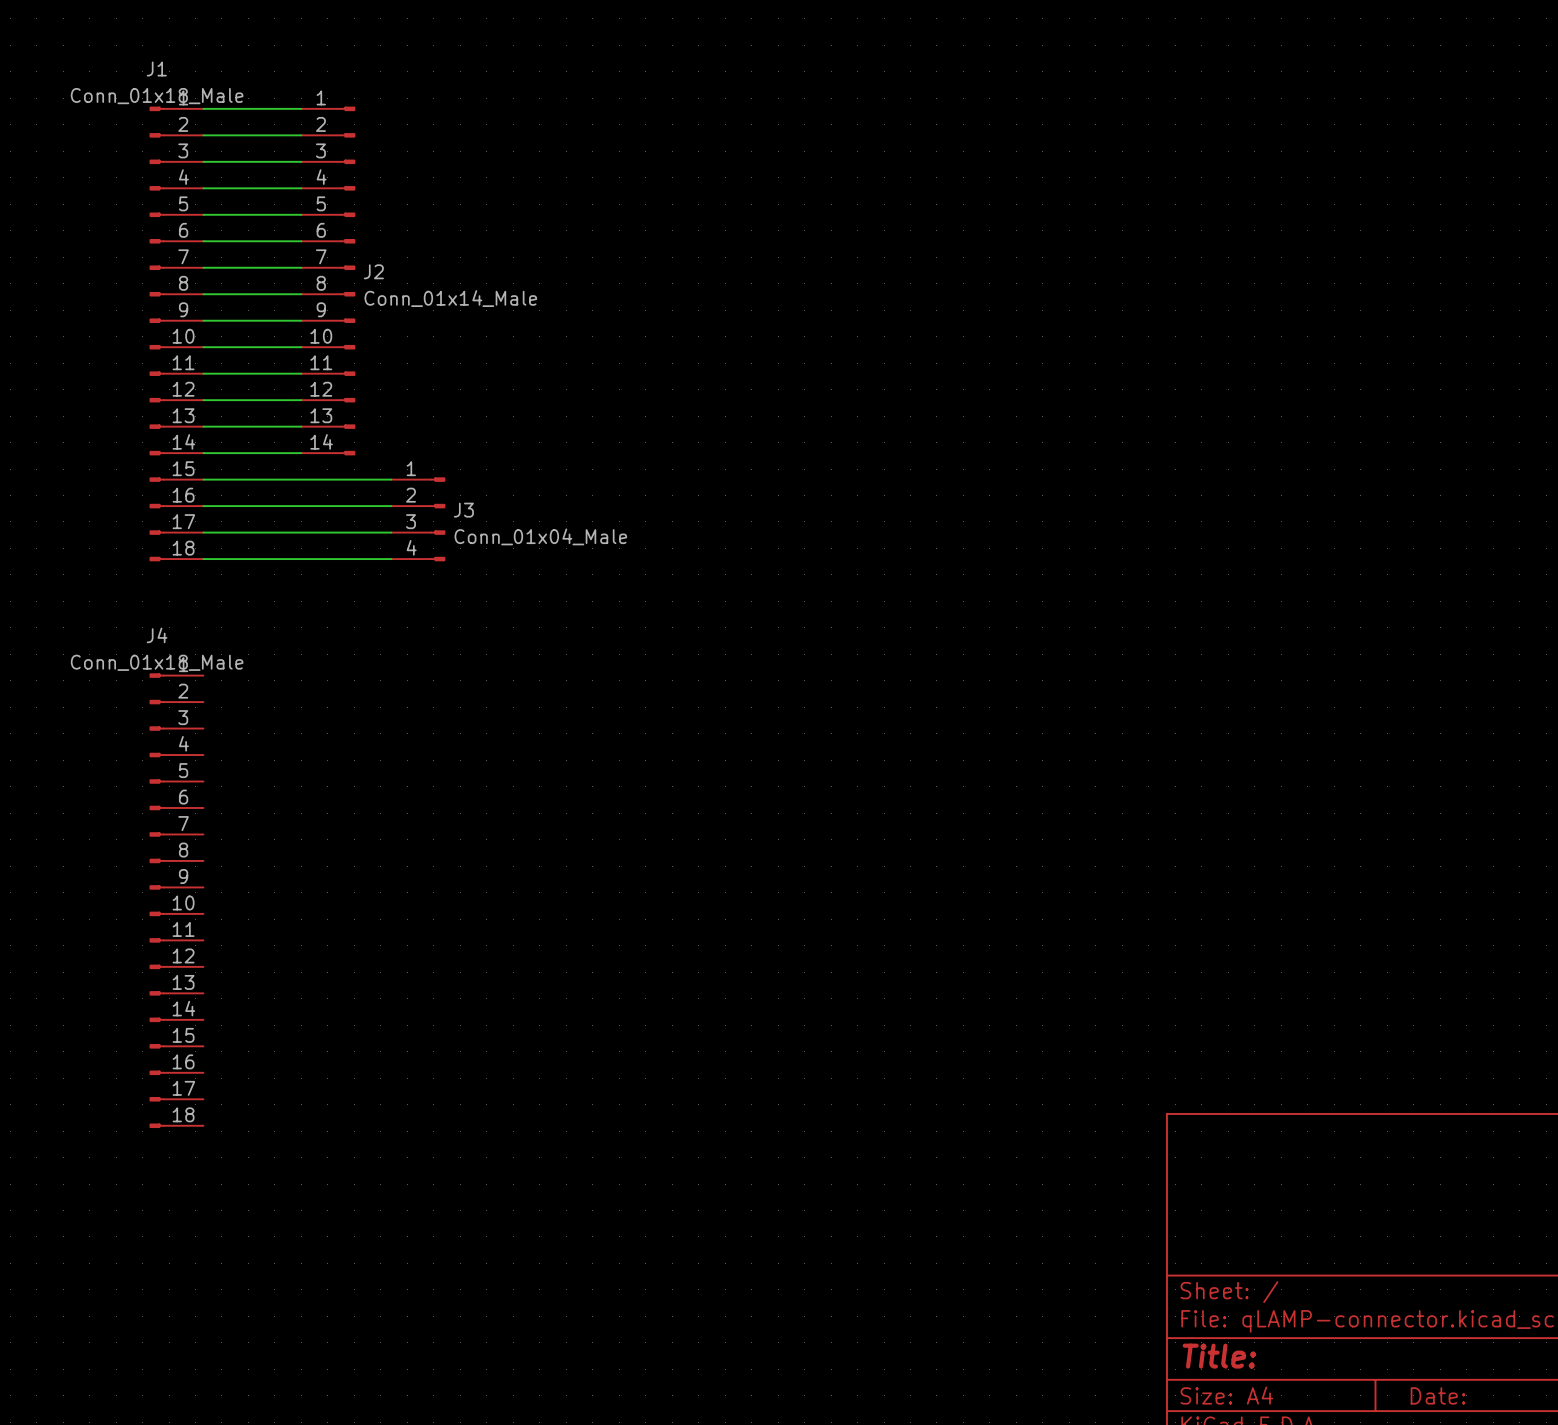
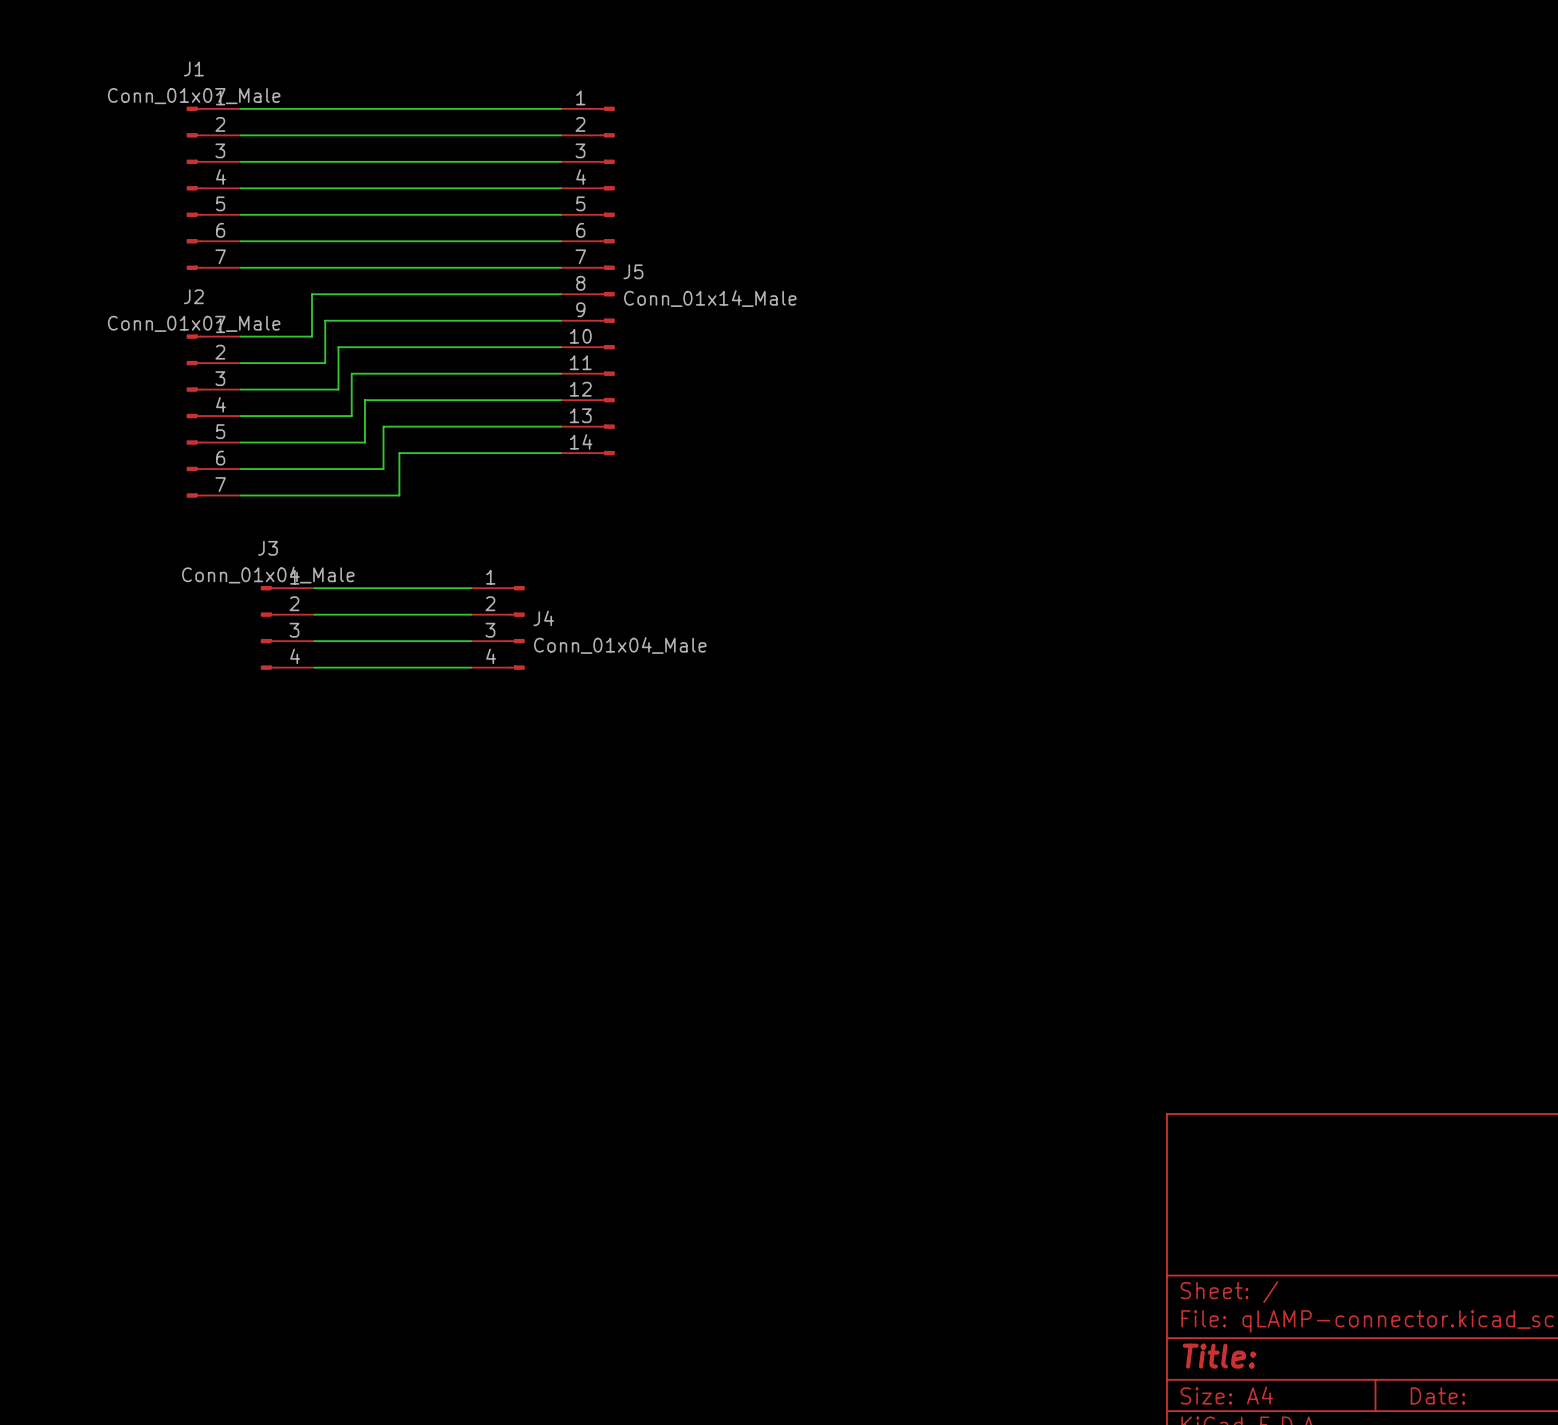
J1 name position: J1 (156, 69) -> J1 (193, 69)
J1 value: Conn_01x18_Male (157, 96) -> Conn_01x07_Male (194, 96)
J1 symbol: [149, 106, 204, 562] -> [186, 106, 241, 270]
J2 symbol: [301, 106, 356, 456] -> [186, 334, 241, 498]
wire: none -> (301, 108) (560, 108)
wire: none -> (301, 135) (560, 135)
wire: none -> (301, 161) (560, 161)
wire: none -> (301, 188) (560, 188)
wire: none -> (301, 214) (560, 214)
wire: none -> (301, 241) (560, 241)
wire: none -> (301, 267) (560, 267)
J2 name position: J2 (373, 271) -> J2 (193, 296)
J5: none -> Conn_01x14_Male (587, 281)
wire: (203, 294) (301, 294) -> none
wire: none -> (560, 294) (312, 294) (312, 336) (240, 336)
J2 value: Conn_01x14_Male (450, 298) -> Conn_01x07_Male (194, 323)
wire: (203, 320) (301, 320) -> none
wire: none -> (560, 320) (325, 320) (325, 363) (240, 363)
wire: (203, 347) (301, 347) -> none
wire: none -> (560, 347) (338, 347) (338, 389) (240, 389)
wire: (203, 373) (301, 373) -> none
wire: none -> (560, 373) (351, 373) (351, 416) (240, 416)
wire: (203, 400) (301, 400) -> none
wire: none -> (560, 400) (364, 400) (364, 442) (240, 442)
wire: (203, 426) (301, 426) -> none
wire: none -> (560, 426) (383, 426) (383, 469) (240, 469)
wire: (203, 453) (301, 453) -> none
wire: none -> (560, 453) (399, 453) (399, 495) (240, 495)
wire: (203, 479) (391, 479) -> none
wire: (203, 506) (391, 506) -> none
J3 name position: J3 (463, 510) -> J3 (268, 548)
J3 position: (418, 519) -> (287, 627)
J3 flip: as is (437, 519) -> left-right (268, 627)
wire: (203, 532) (391, 532) -> none
J3 value position: Conn_01x04_Male (540, 536) -> Conn_01x04_Male (268, 575)
wire: (203, 559) (391, 559) -> none
wire: none -> (314, 588) (470, 588)
wire: none -> (314, 614) (470, 614)
J4 name position: J4 (157, 635) -> J4 (543, 618)
wire: none -> (314, 641) (470, 641)
J4 value: Conn_01x18_Male (157, 662) -> Conn_01x04_Male (620, 645)
wire: none -> (314, 667) (470, 667)
J4 symbol: [149, 673, 204, 1128] -> [470, 586, 525, 670]

